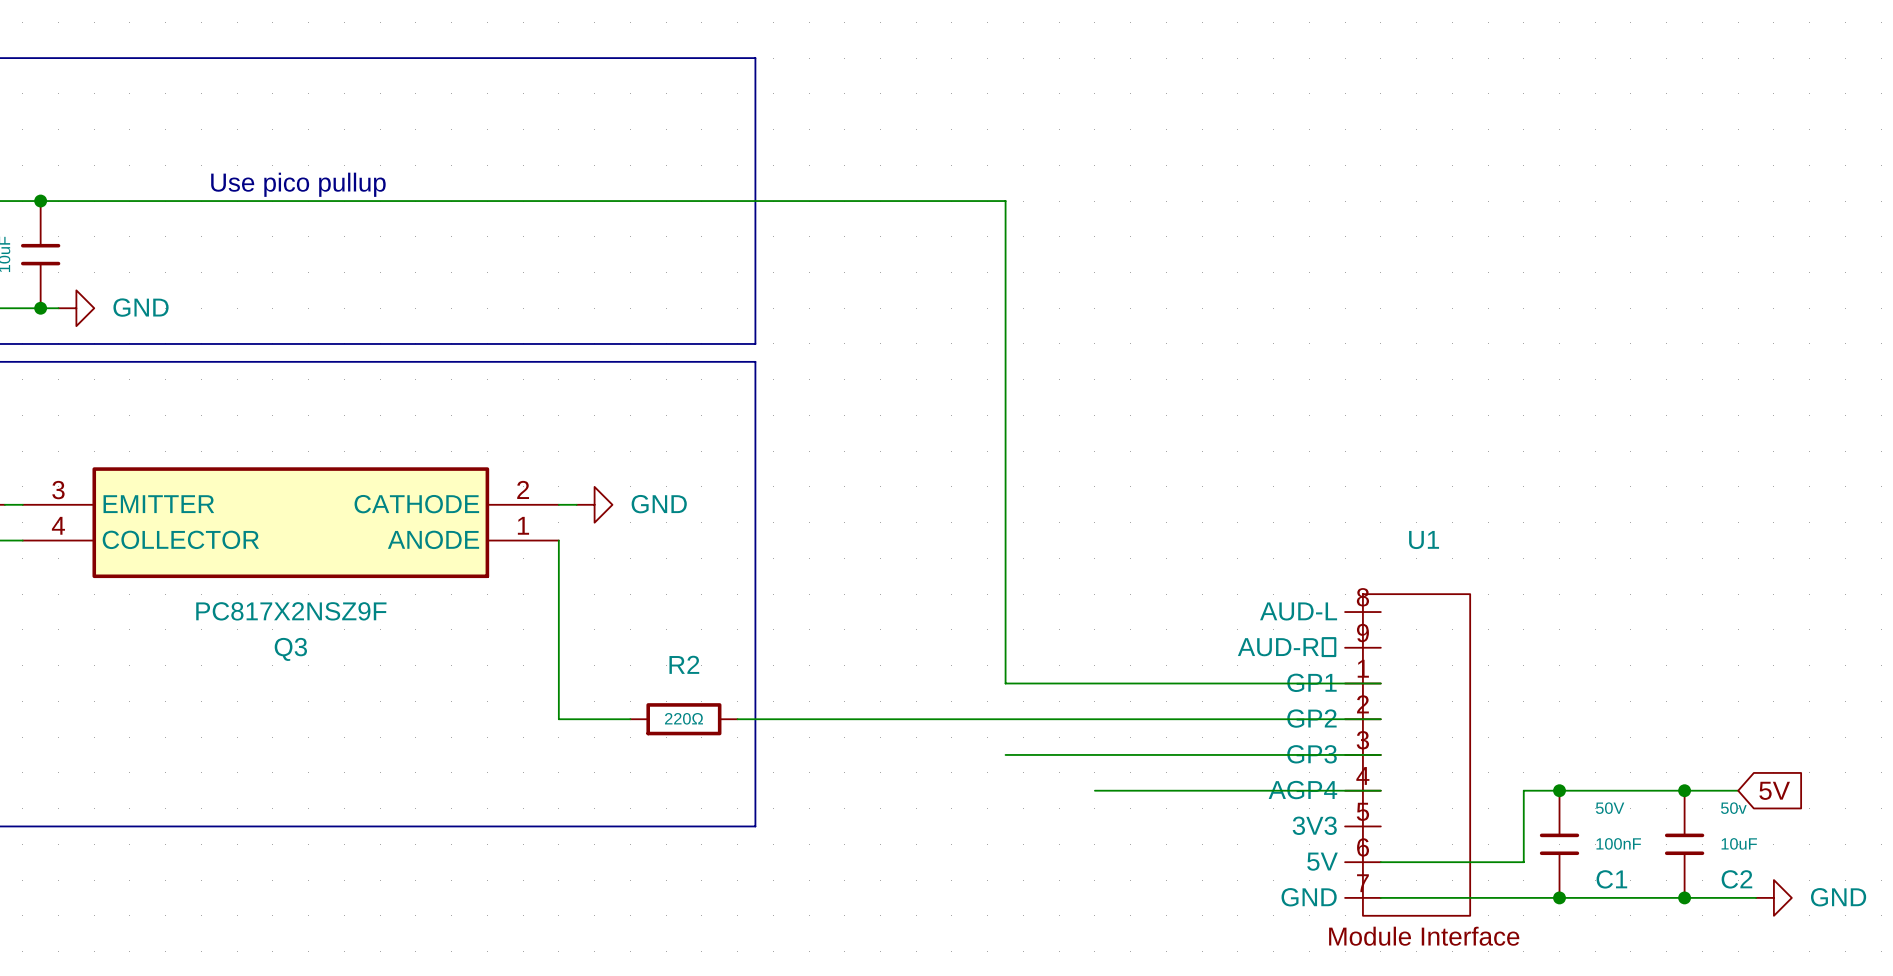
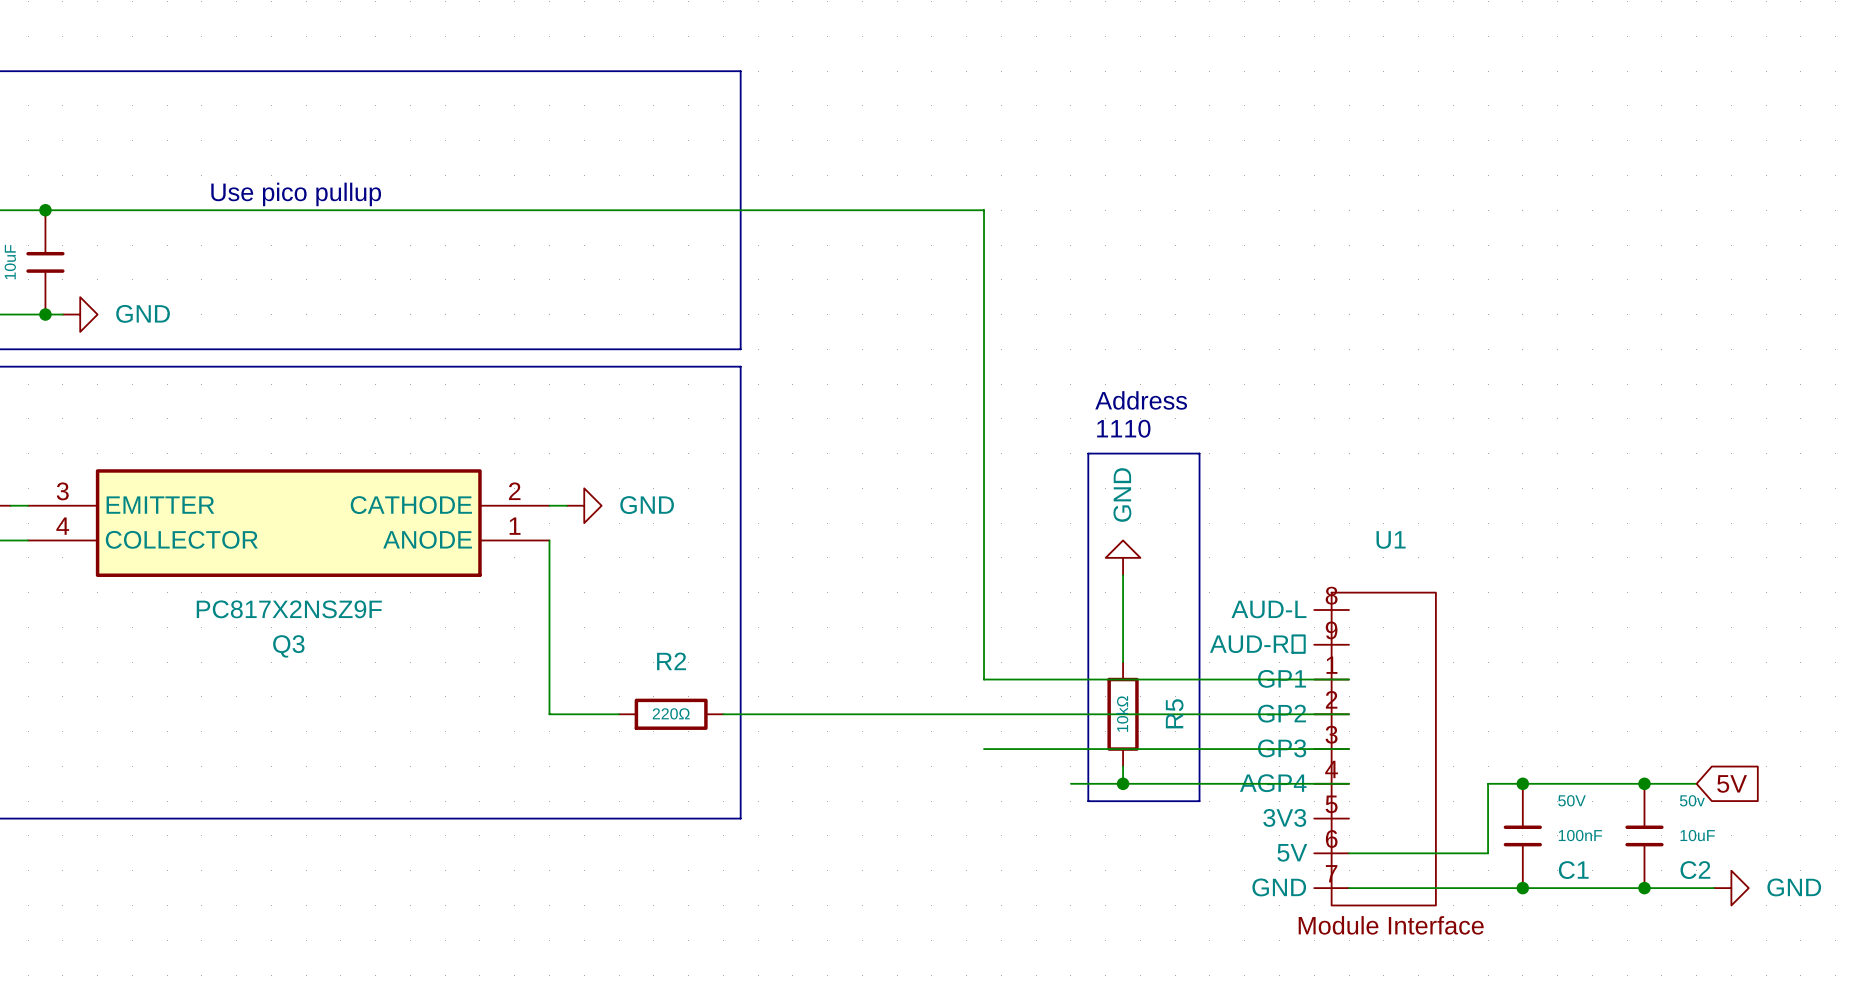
text: none -> Address (1141, 400)
text: none -> 1110 (1123, 428)
line: none -> (1088, 453) (1199, 453) (1199, 801) (1088, 801) (1088, 453)
power symbol: none -> GND (1123, 557)
wire: none -> (1123, 575) (1123, 662)
R5: none -> 10kΩ (1123, 714)
wire: none -> (1123, 766) (1123, 783)
junction: none -> (1123, 783)

